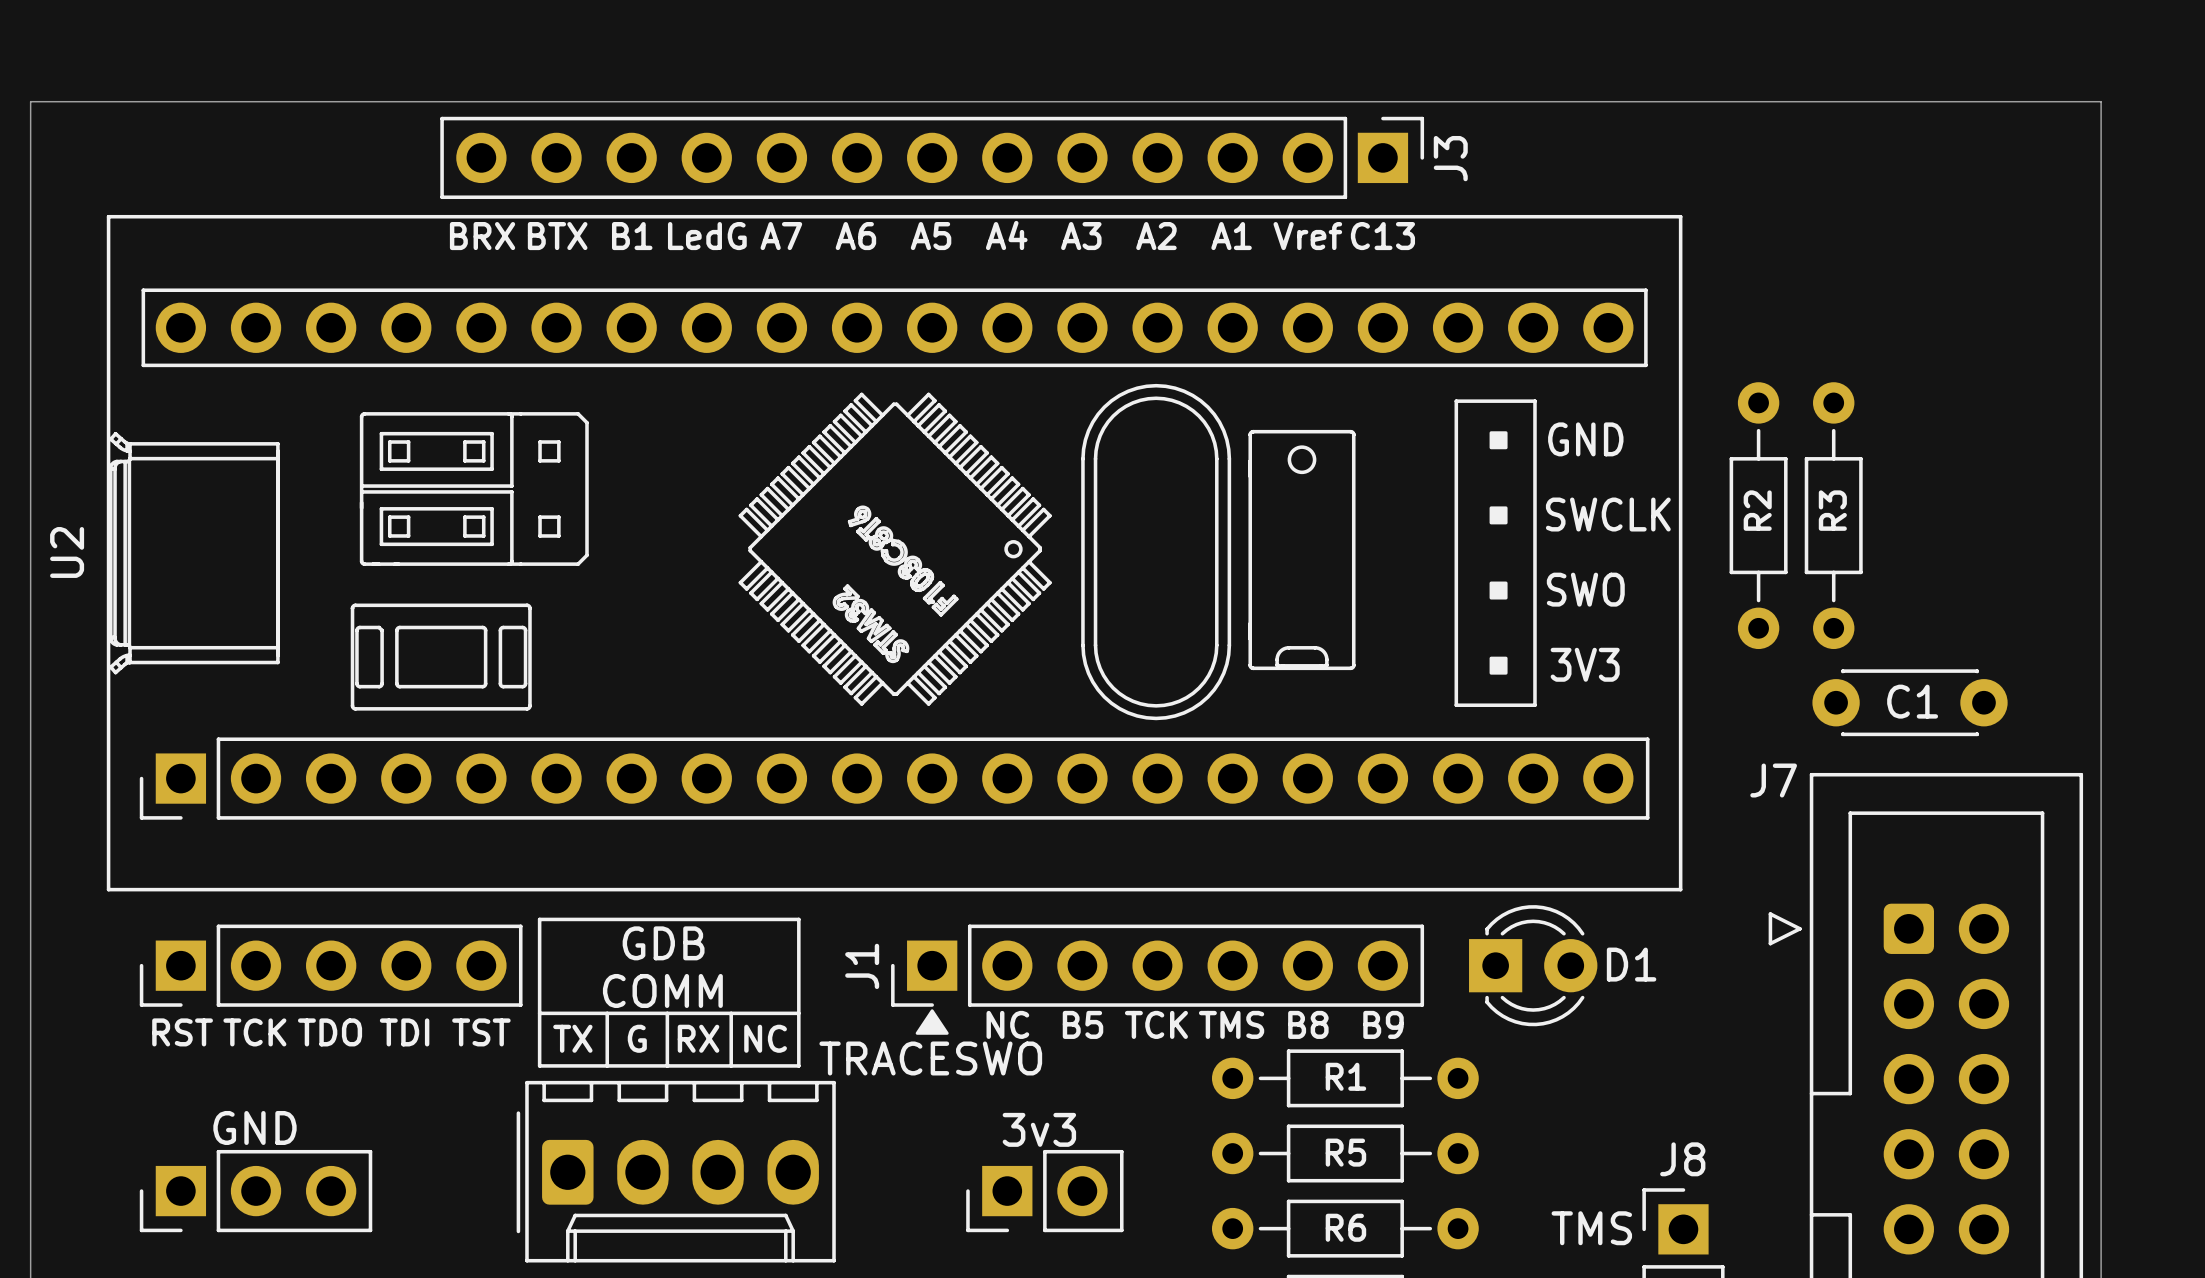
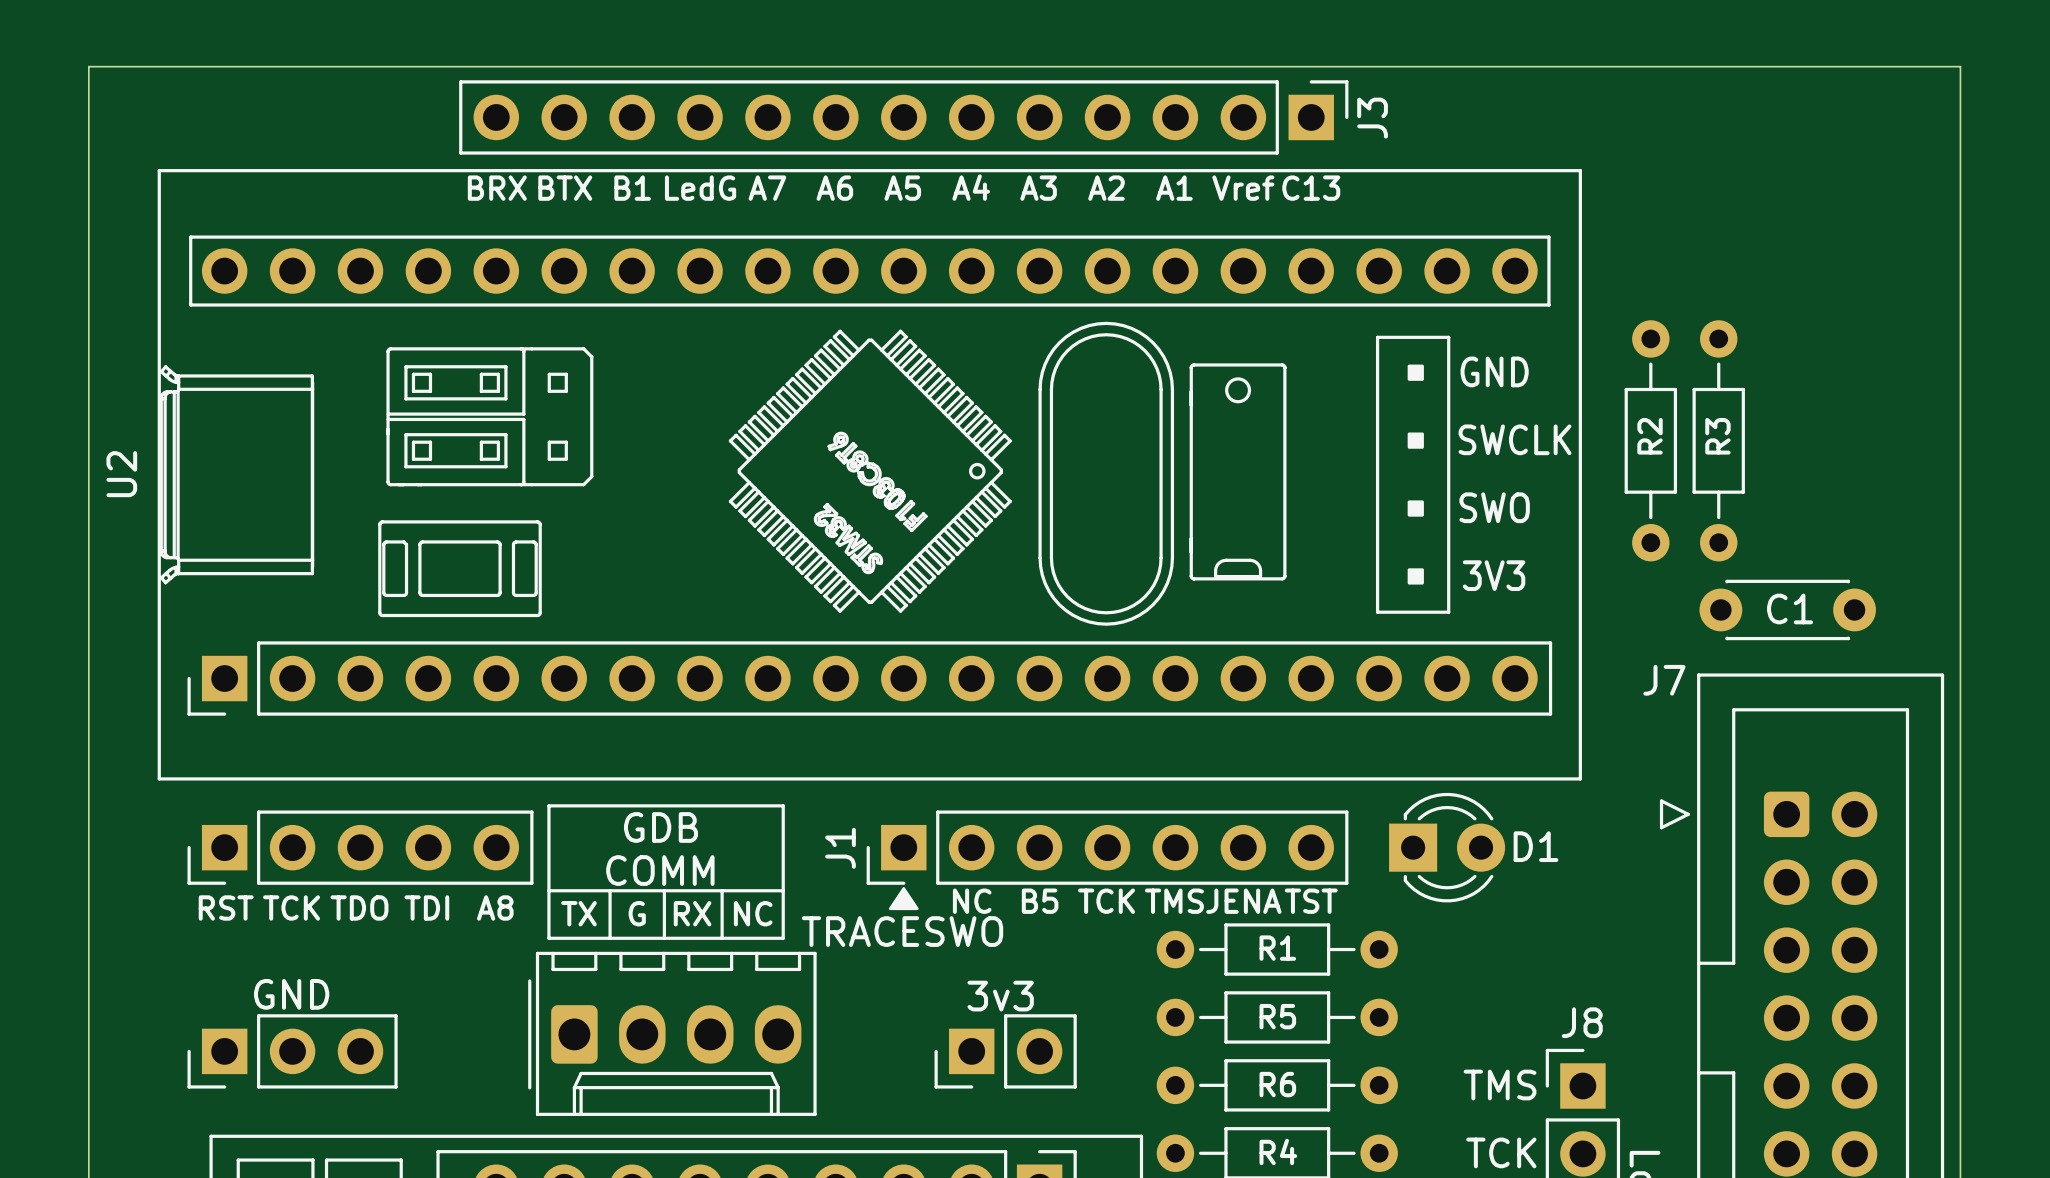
text: B8 (1308, 1024) -> JENA (1243, 901)
text: B9 (1383, 1024) -> TST (1311, 901)
text: TST (481, 1032) -> A8 (495, 907)

